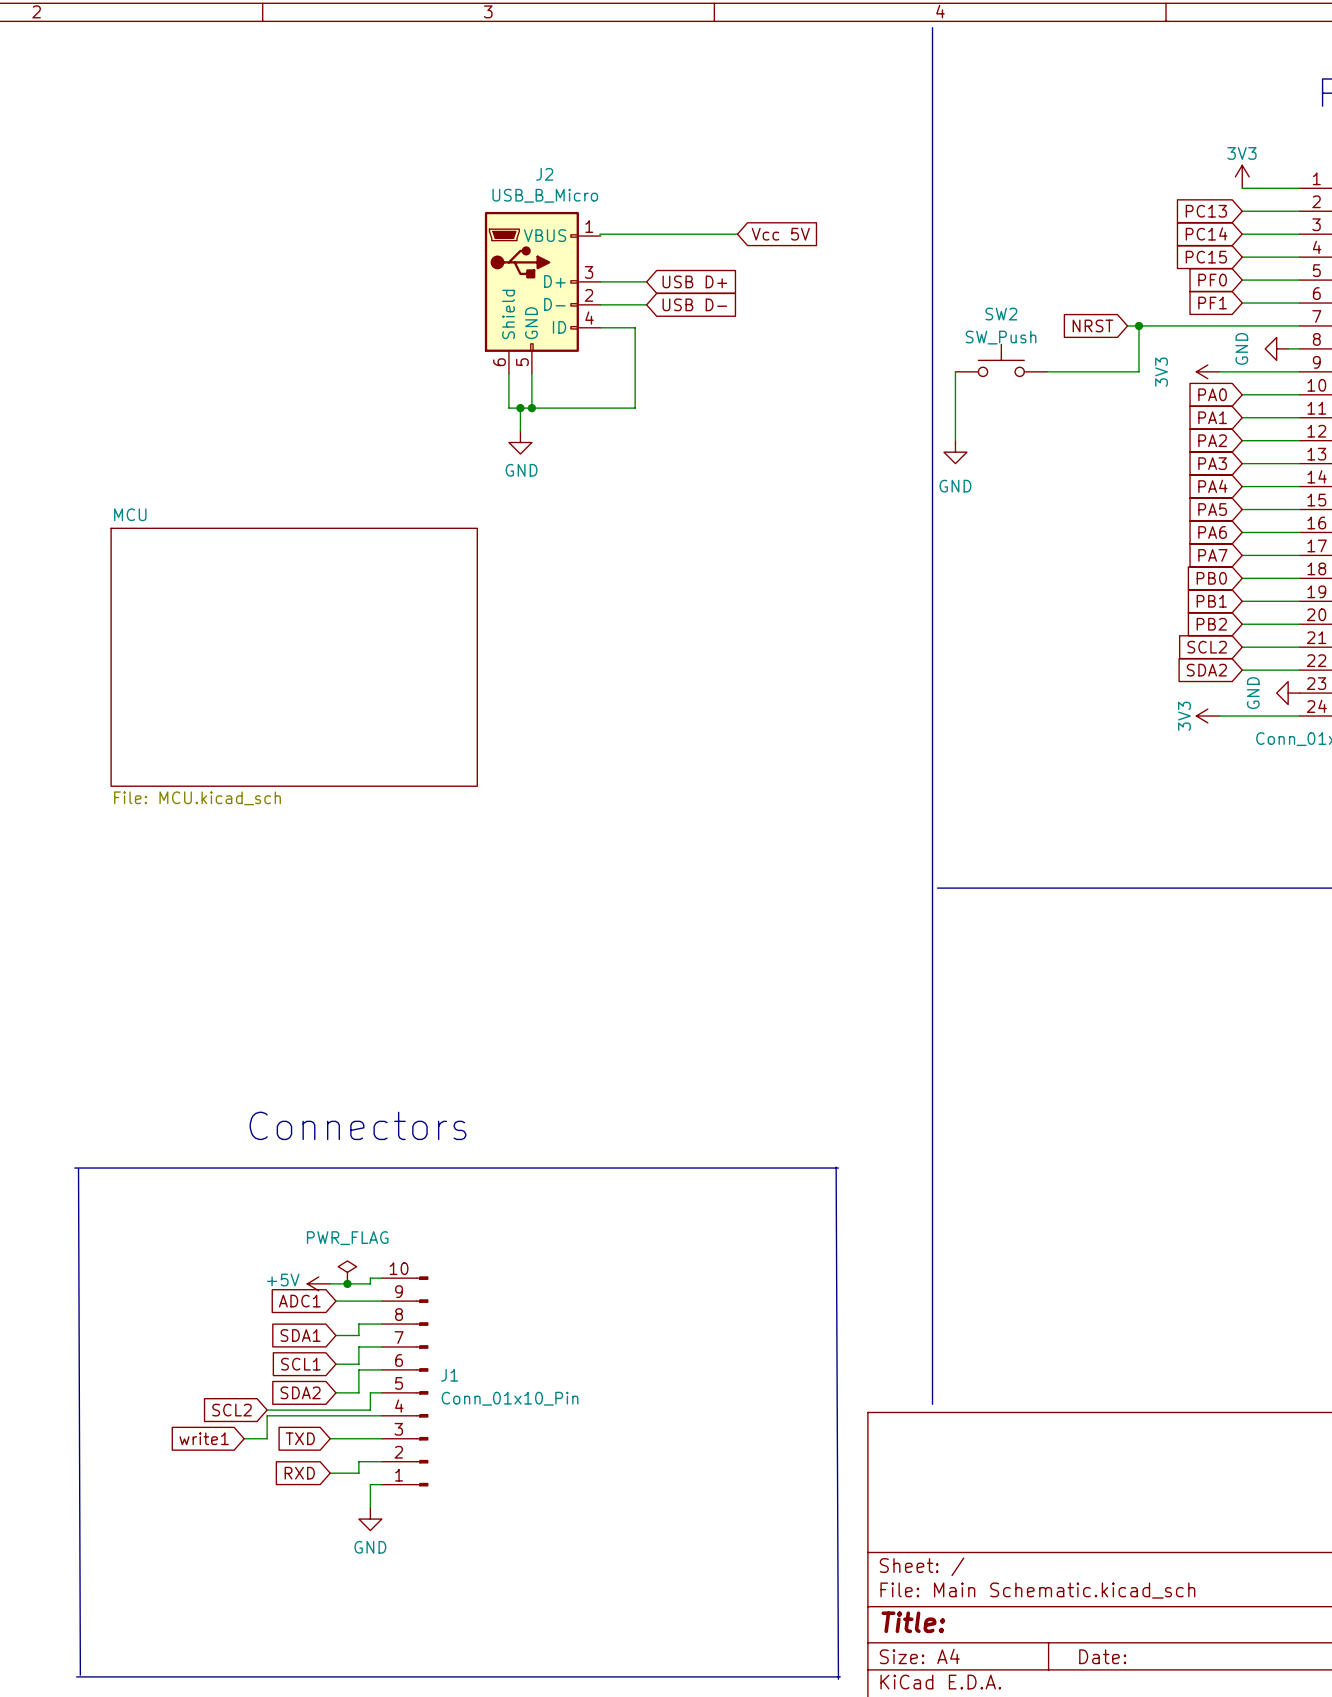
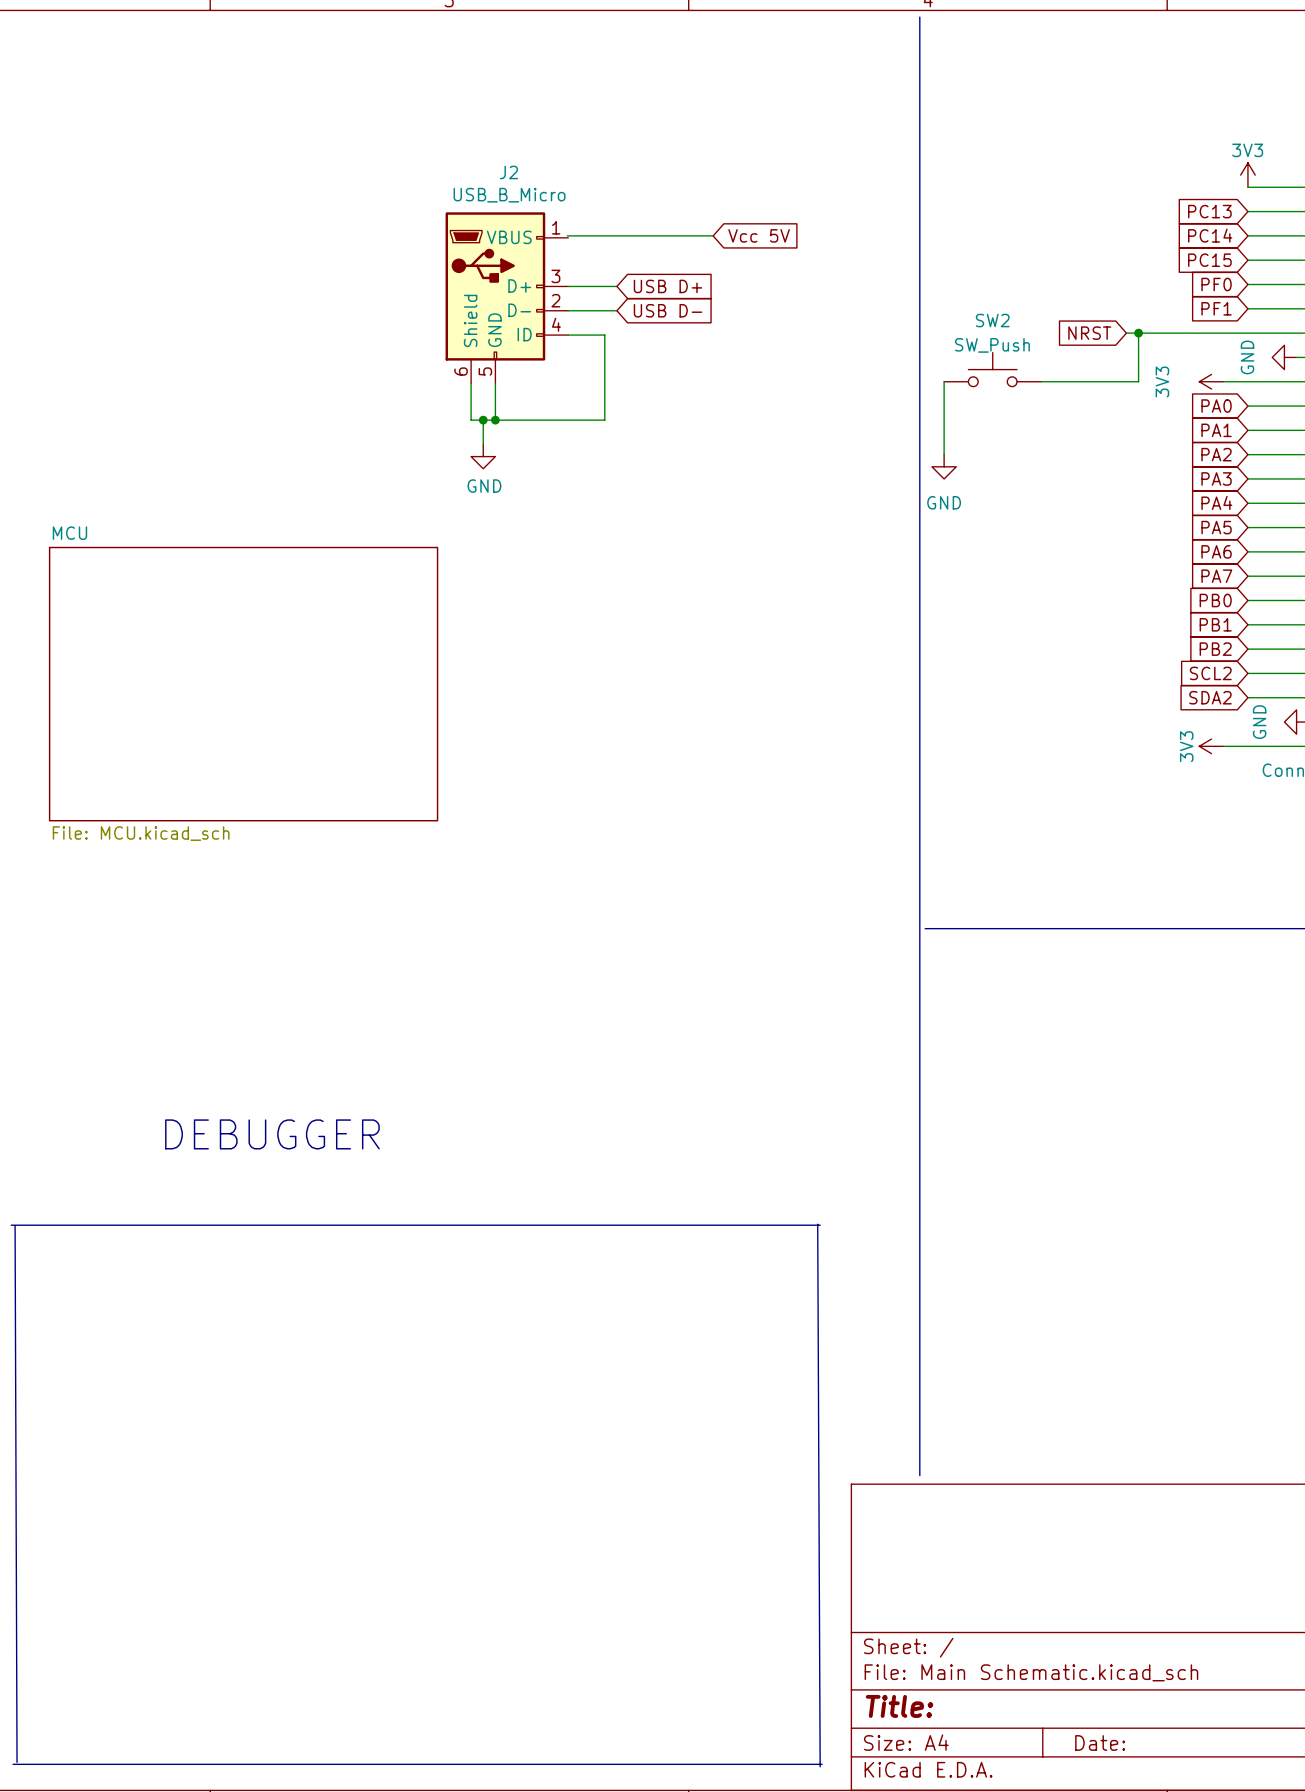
text: none -> DEBUGGER (272, 1134)
text: Connectors (358, 1125) -> none
power symbol: PWR_FLAG (347, 1272) -> none
wire: (381, 1278) (370, 1278) (370, 1283) (330, 1283) -> none
power symbol: +5V (318, 1283) -> none
junction: (347, 1283) -> none
global label: ADC1 (299, 1301) -> none
wire: (335, 1301) (381, 1301) -> none
wire: (381, 1324) (358, 1324) (358, 1335) (335, 1335) -> none
global label: SDA1 (300, 1335) -> none
wire: (381, 1346) (358, 1346) (358, 1364) (335, 1364) -> none
global label: SCL1 (300, 1364) -> none
wire: (381, 1369) (358, 1369) (358, 1392) (335, 1392) -> none
J1: Conn_01x10_Pin (405, 1381) -> none
global label: SDA2 (300, 1392) -> none
wire: (381, 1392) (370, 1392) (370, 1410) (267, 1410) -> none
global label: SCL2 (232, 1410) -> none
wire: (381, 1415) (267, 1415) (267, 1438) (244, 1438) -> none
global label: write1 (204, 1438) -> none
global label: TXD (300, 1438) -> none
wire: (330, 1438) (381, 1438) -> none
wire: (381, 1461) (358, 1461) (358, 1473) (330, 1473) -> none
global label: RXD (299, 1473) -> none
wire: (381, 1484) (370, 1484) (370, 1507) -> none
power symbol: GND (370, 1519) -> none

